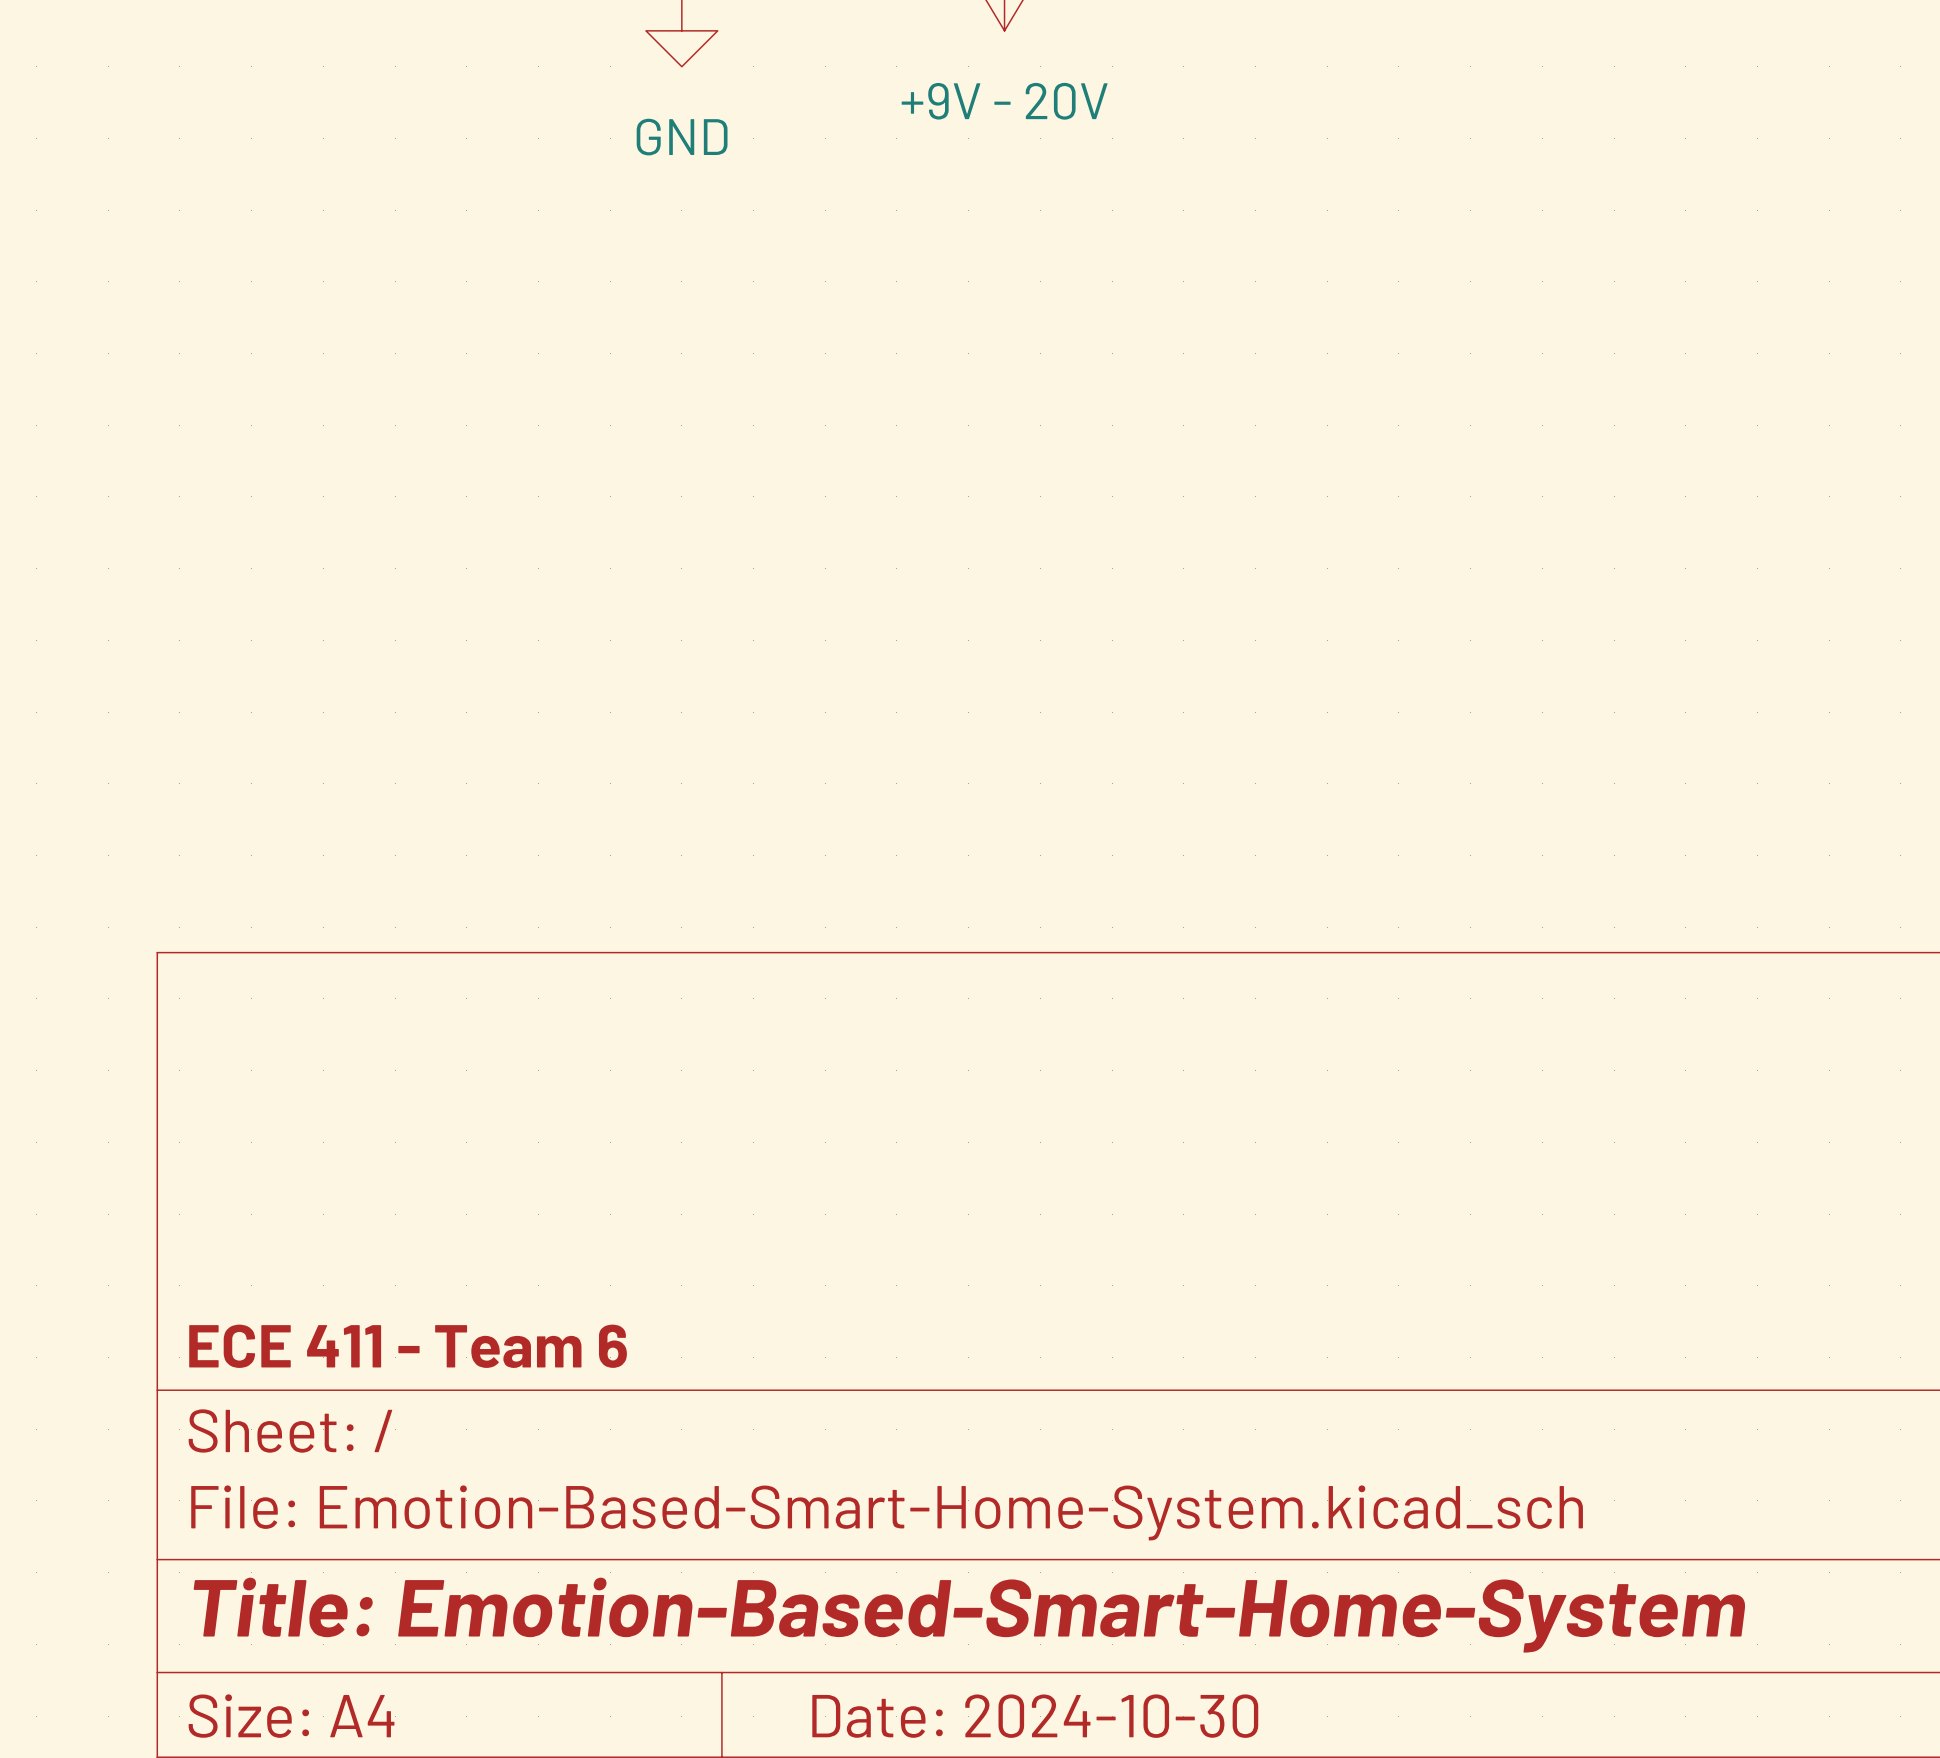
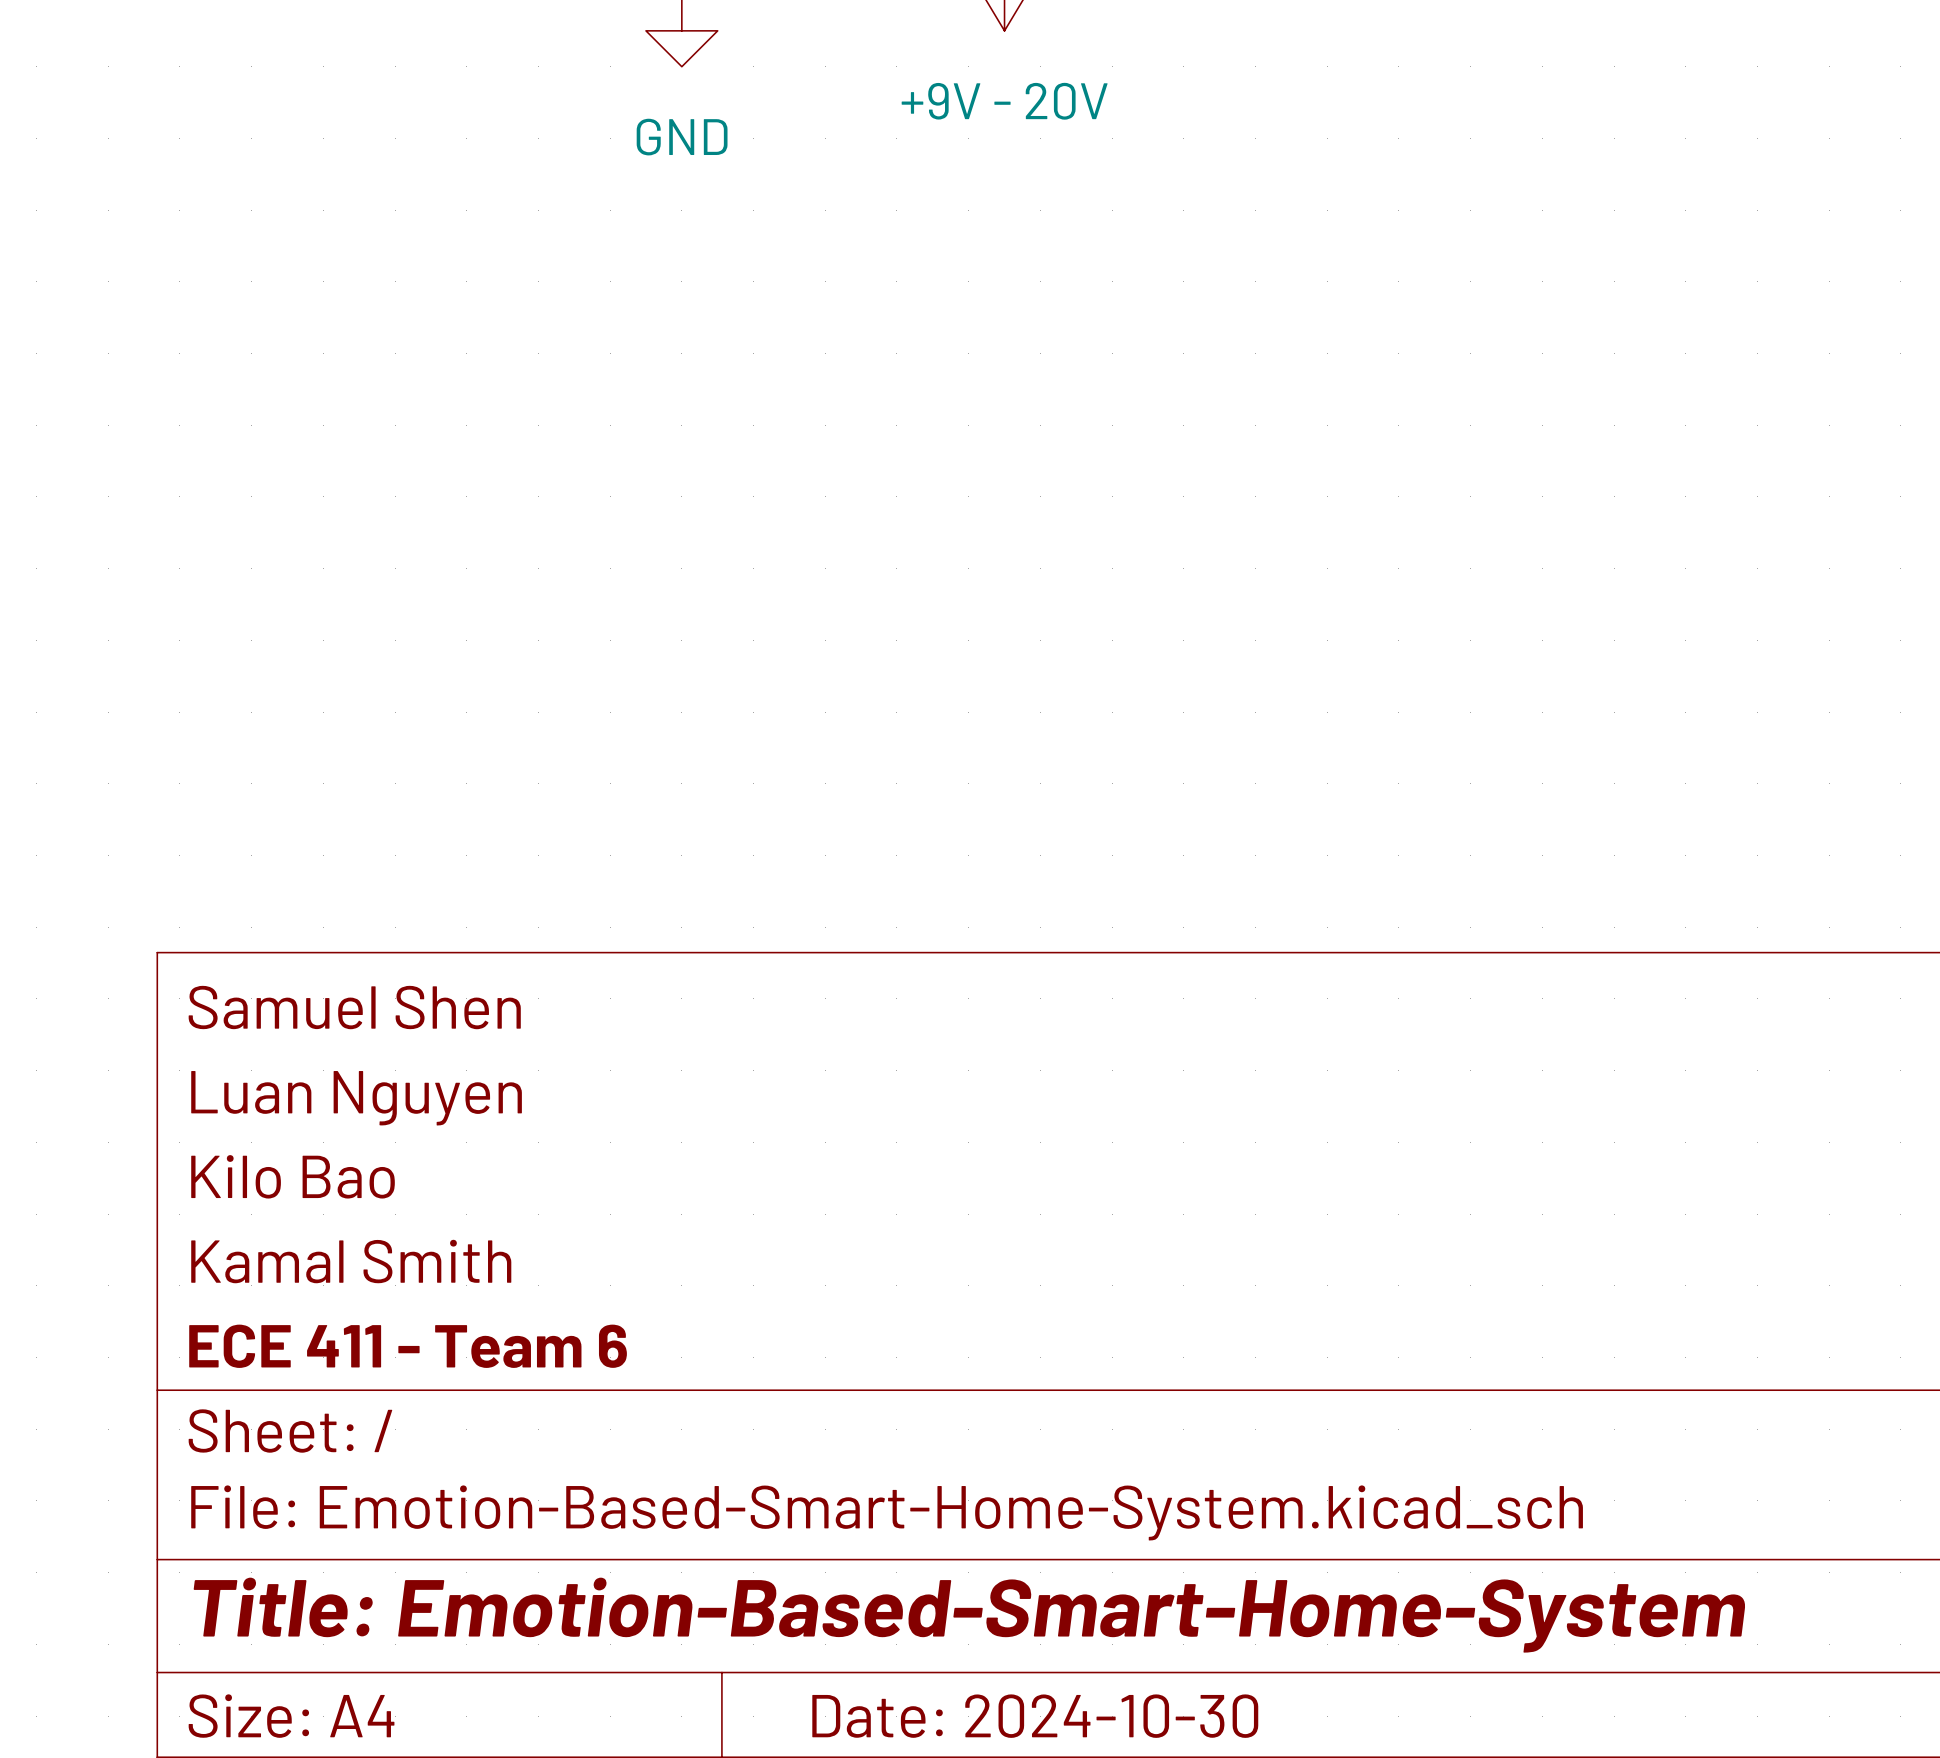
title block: none -> Samuel Shen (354, 1007)
title block: none -> Luan Nguyen (356, 1098)
title block: none -> Kilo Bao (293, 1176)
title block: none -> Kamal Smith (351, 1261)

